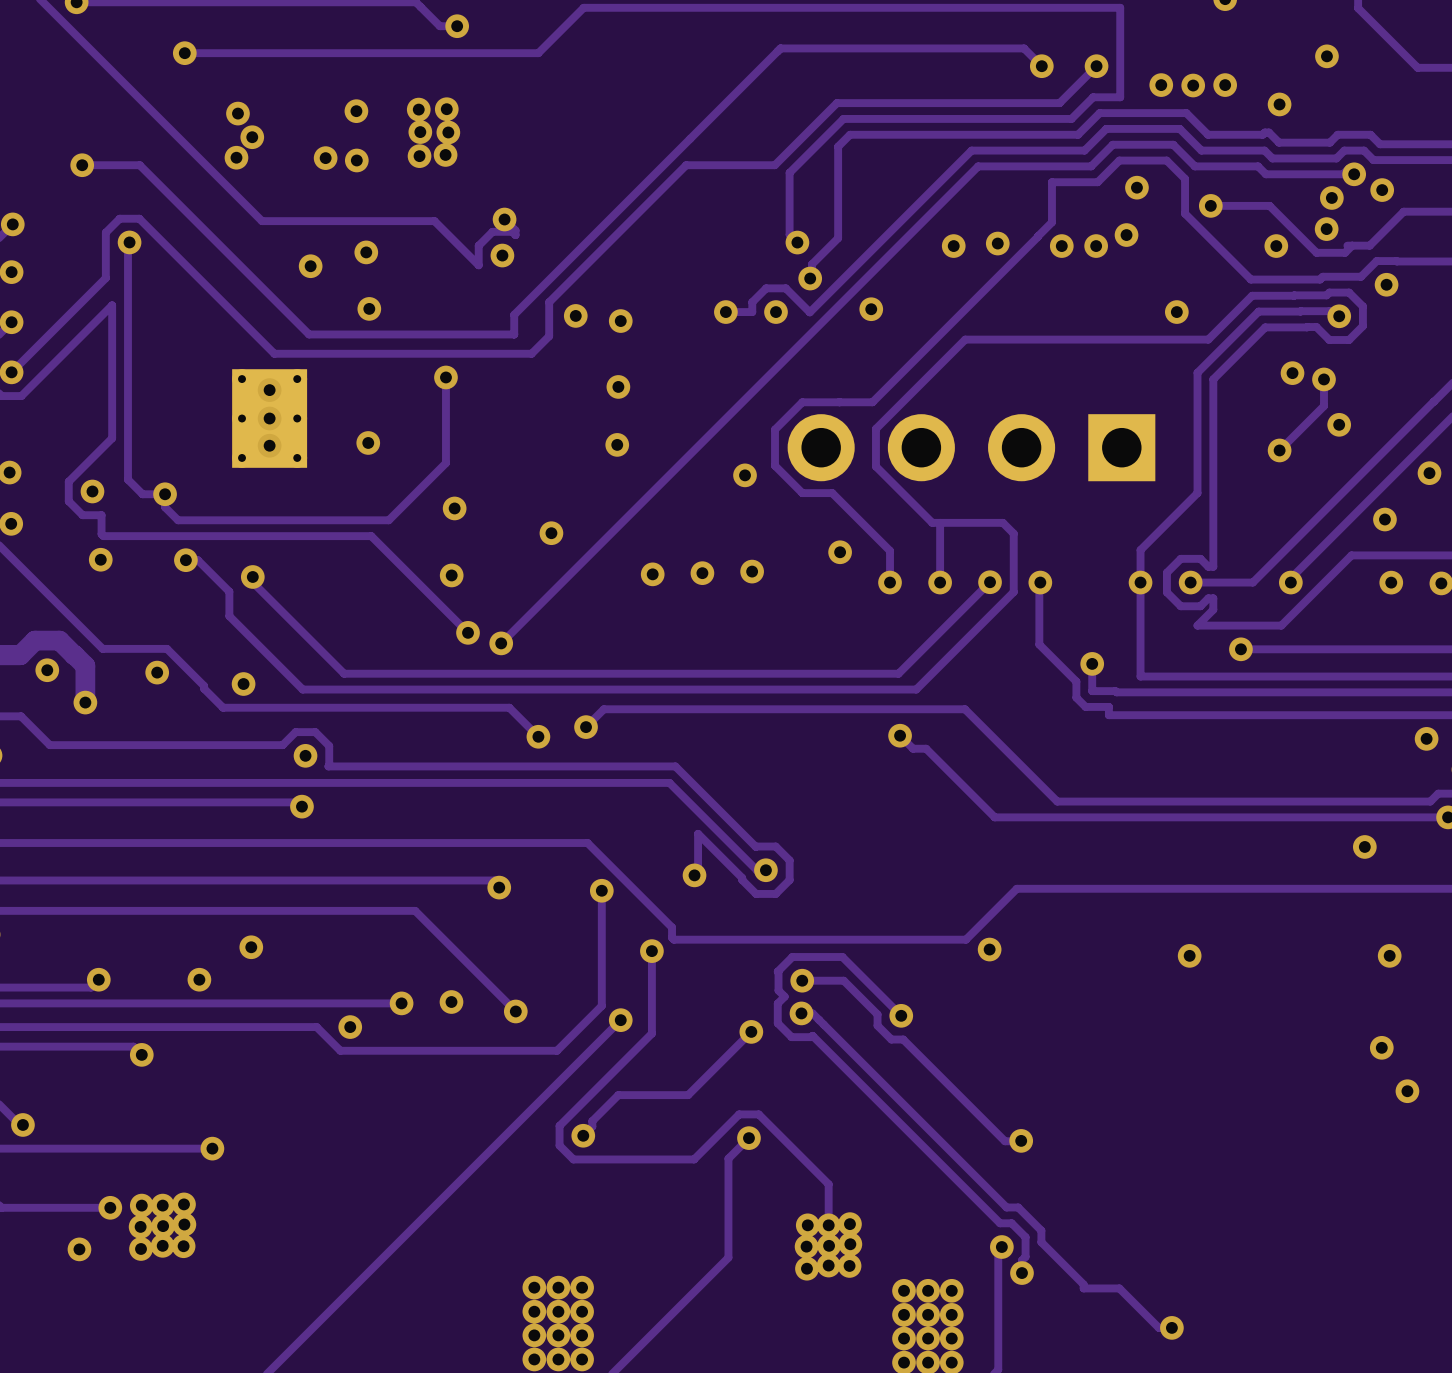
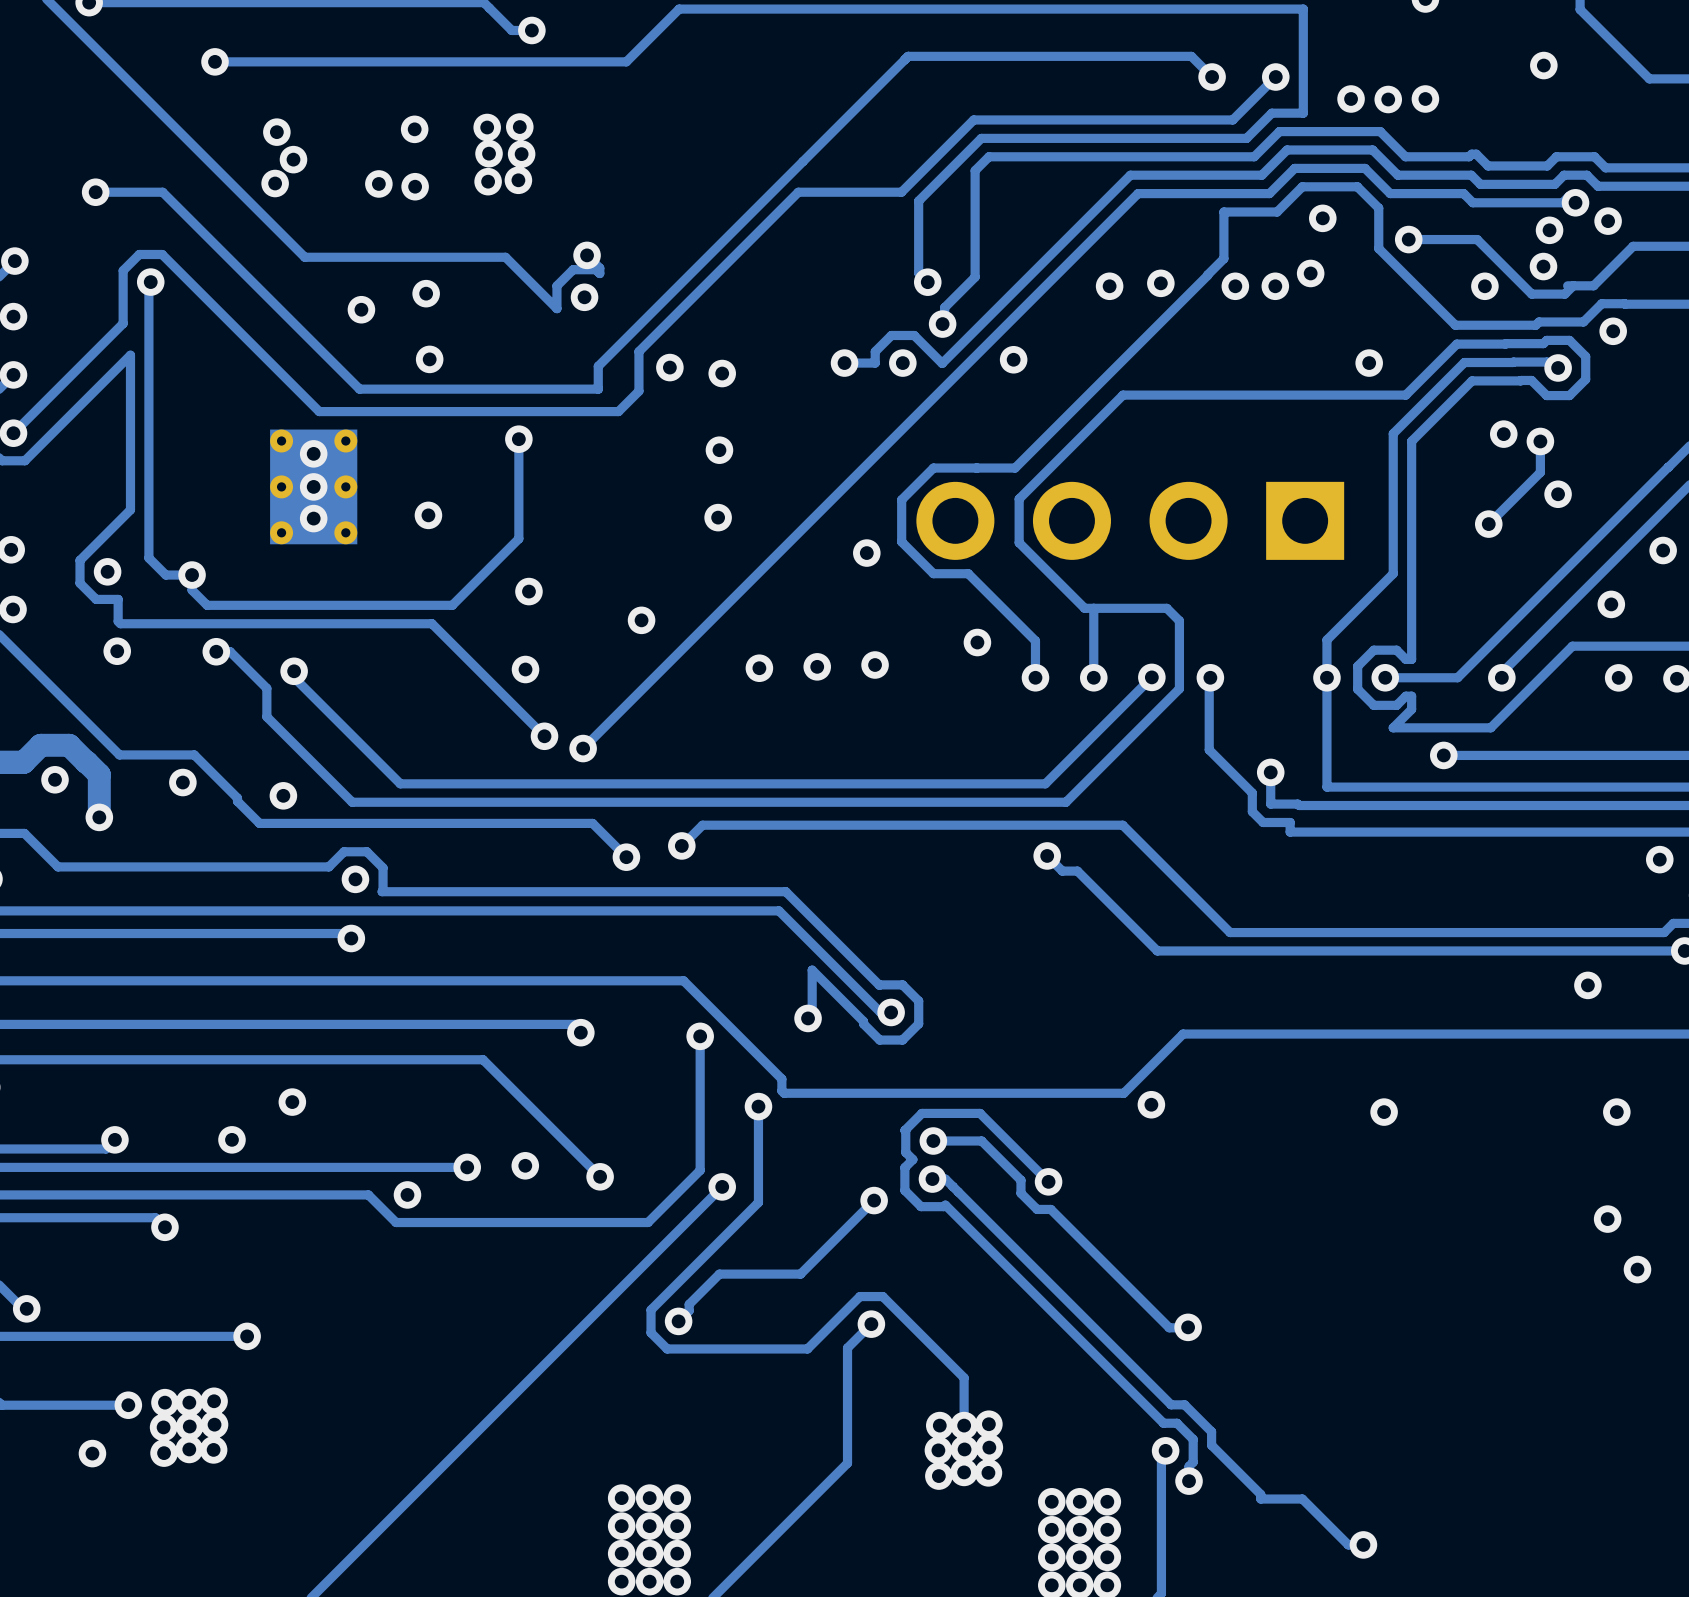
via: (1279, 104) -> none

